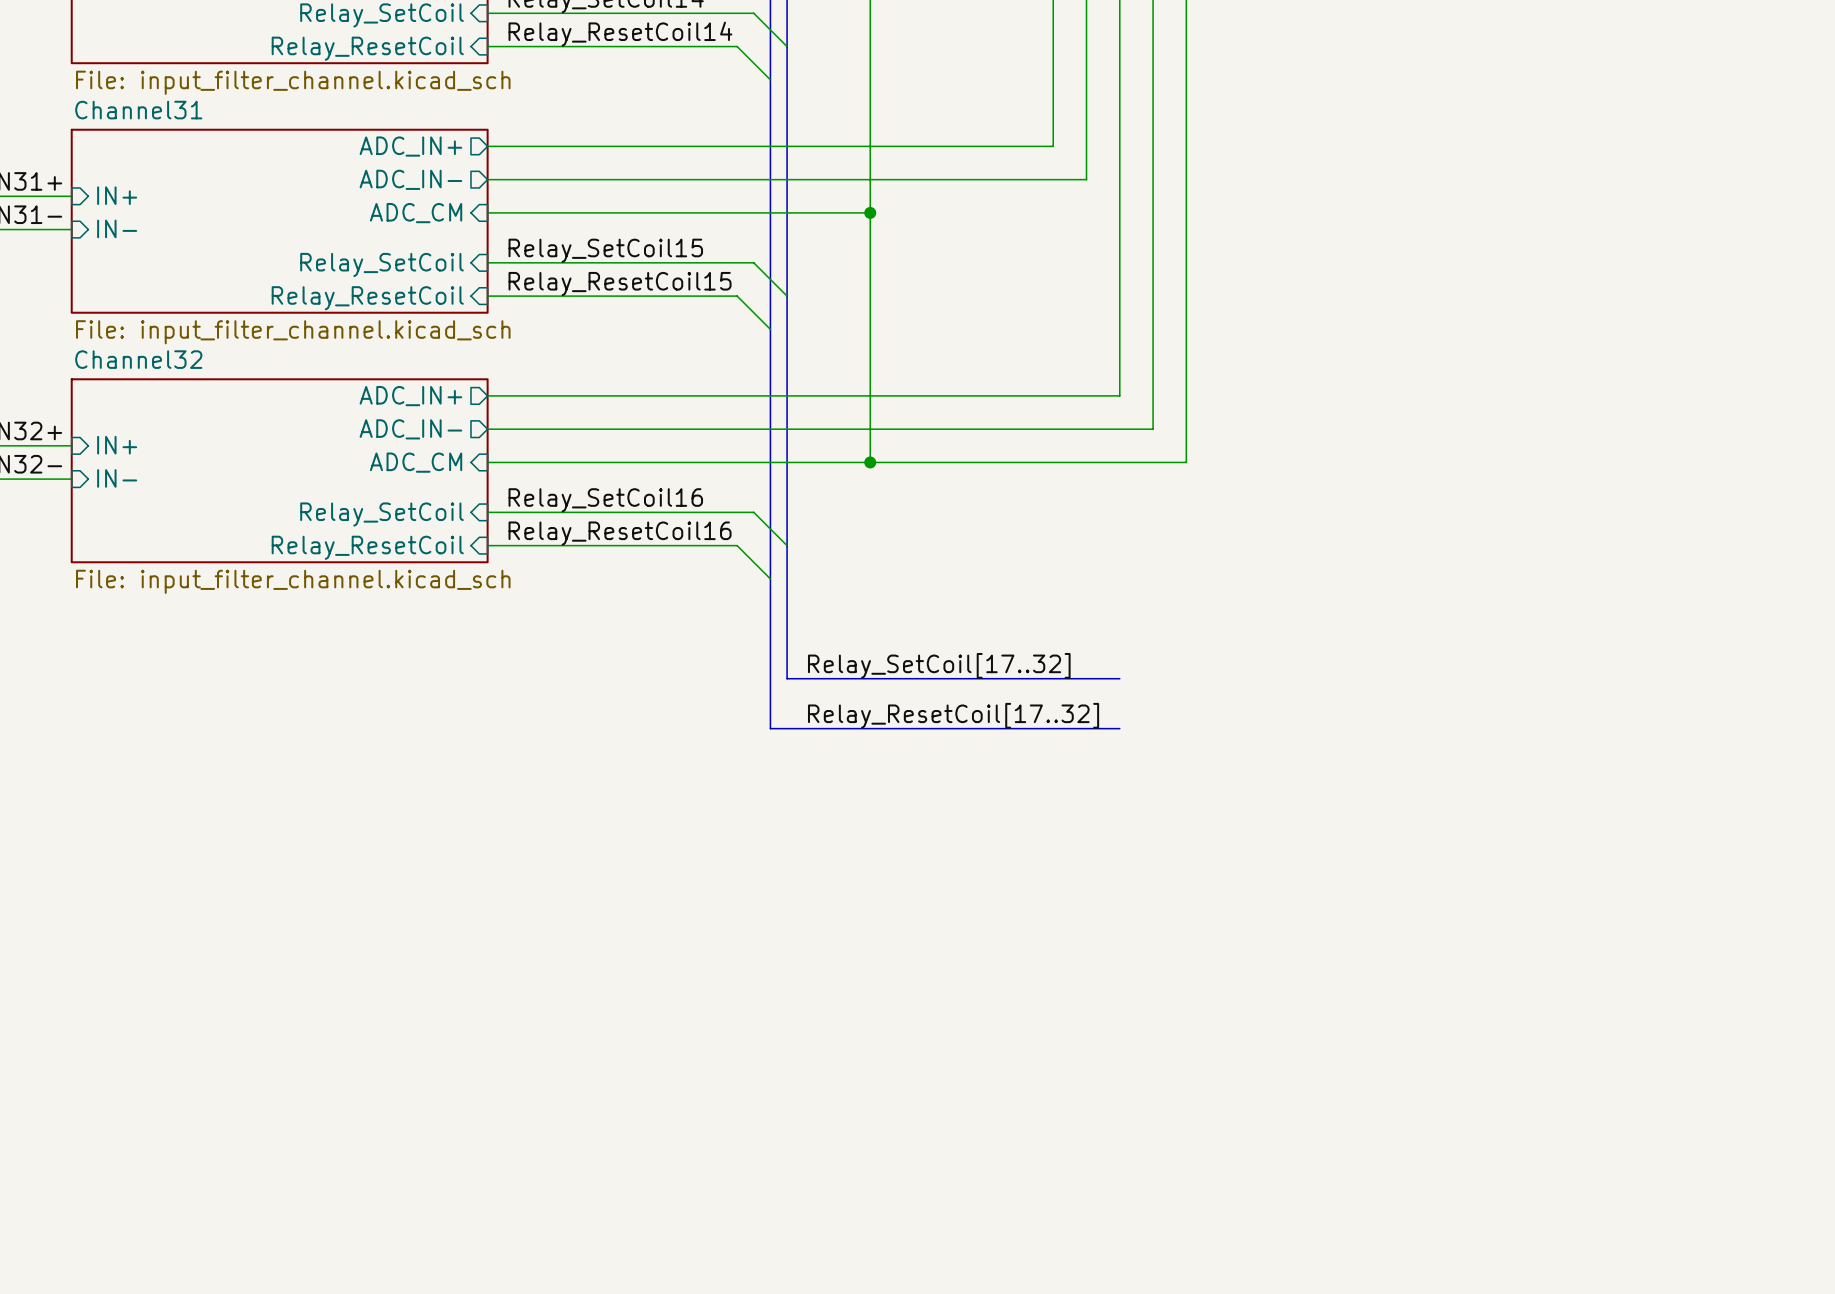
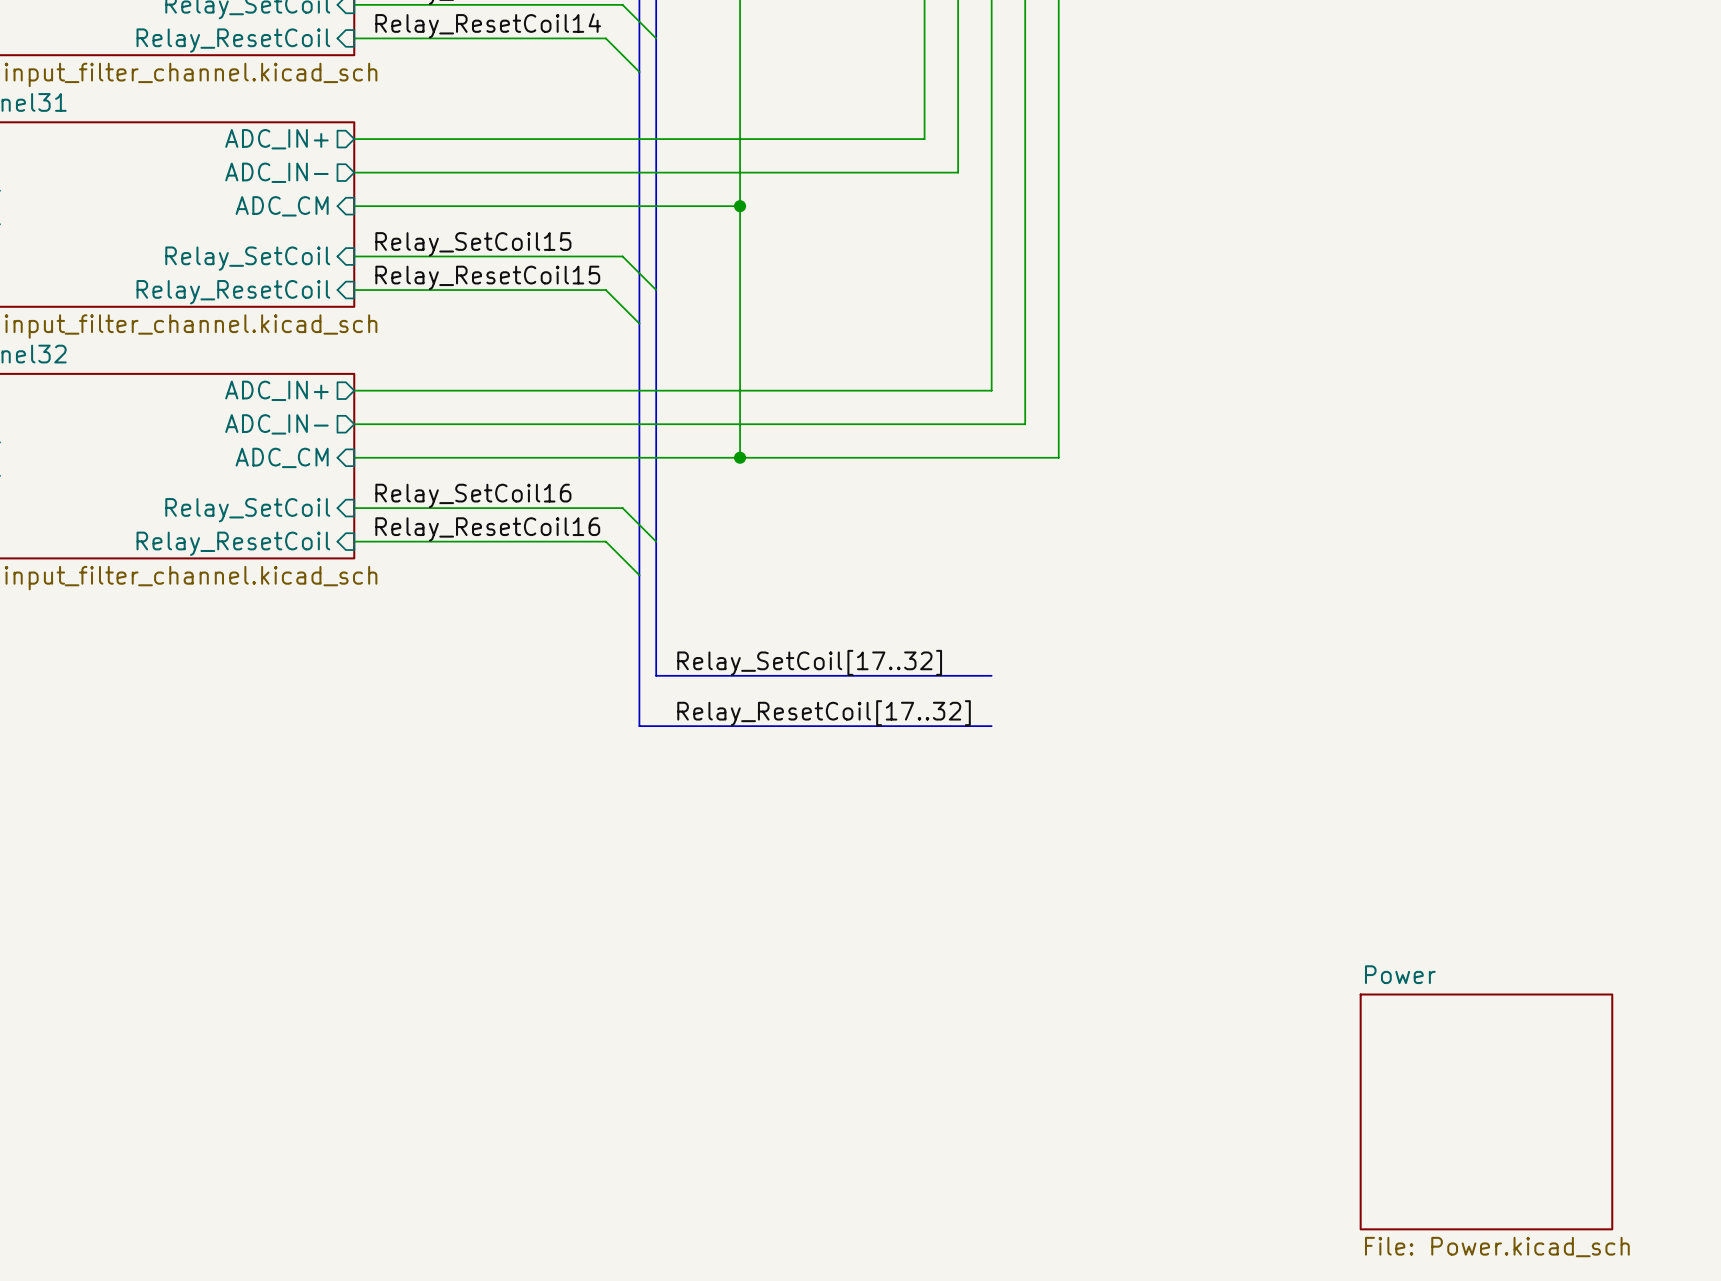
sheet Power: none -> File: Power.kicad_sch (1486, 1111)

